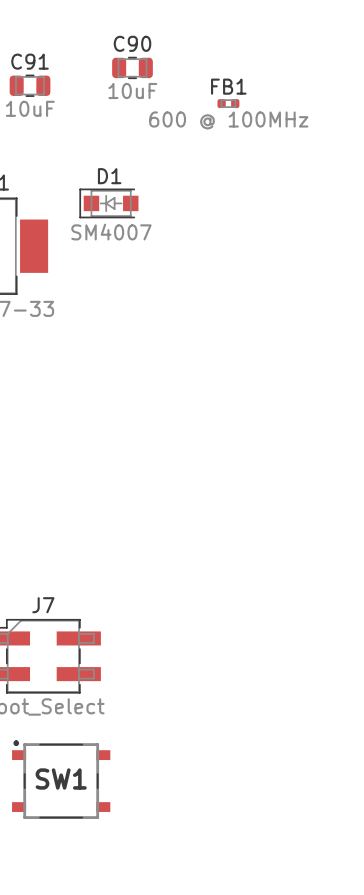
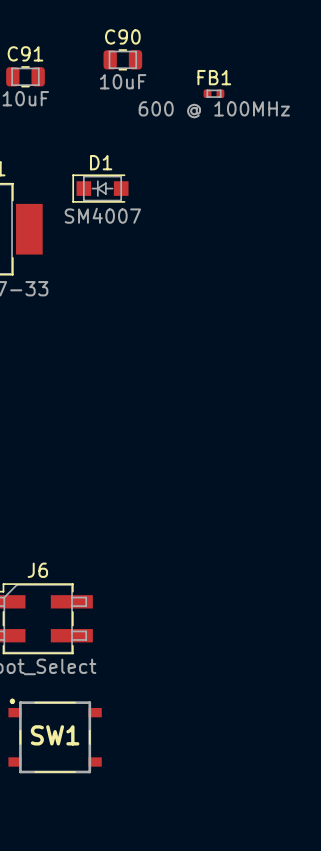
J7 name: J7 (43, 605) -> J6 (37, 570)

